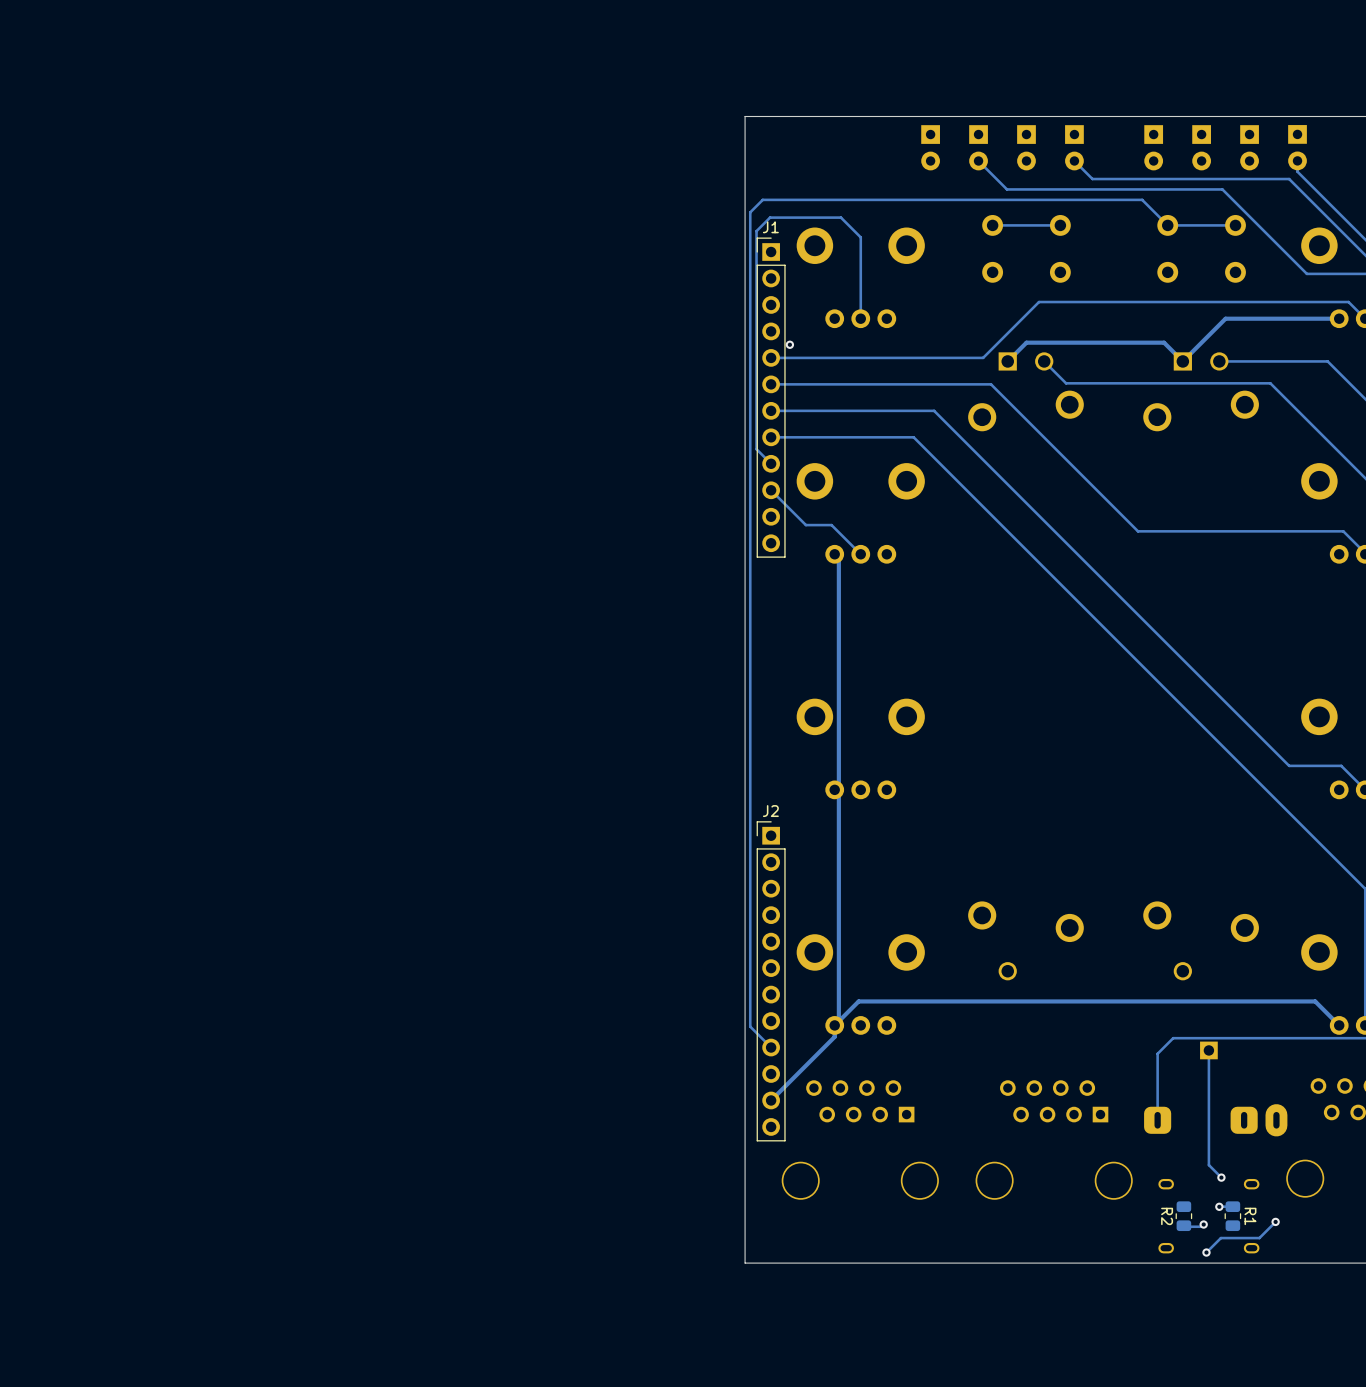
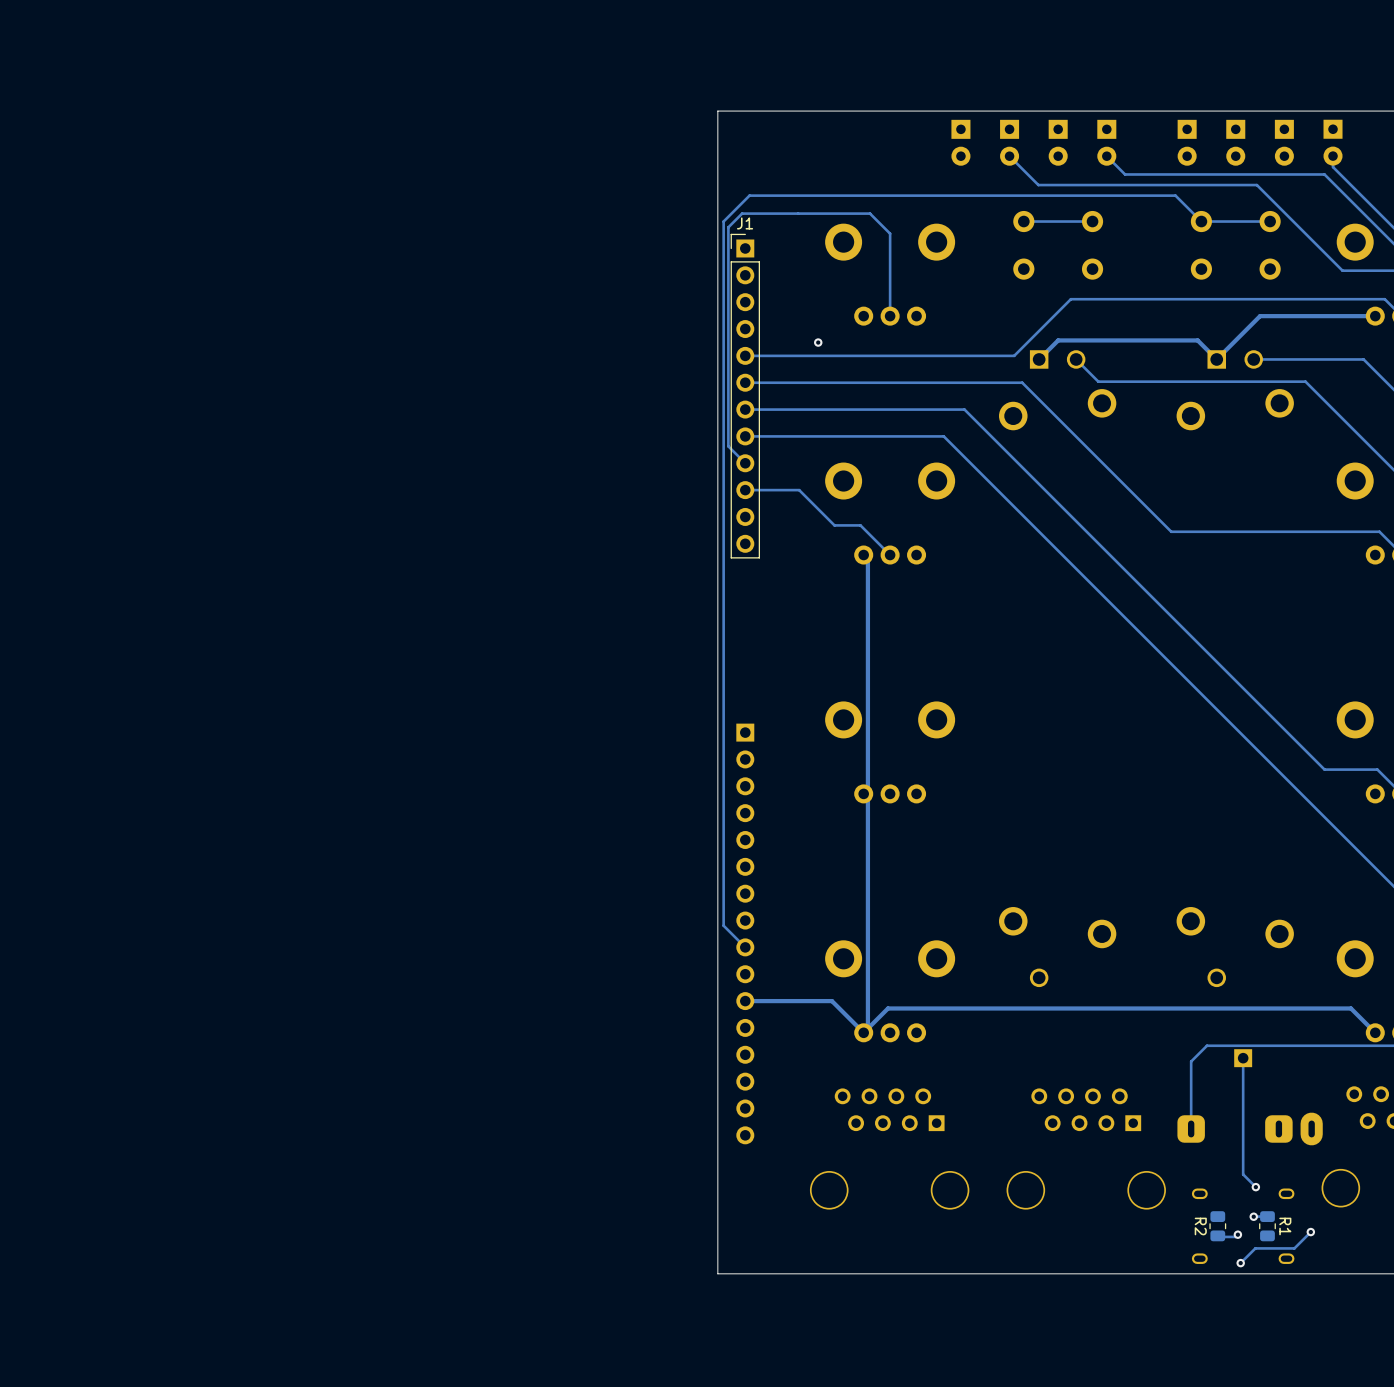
board edge: (745, 116) (745, 1263) -> (772, 111) (717, 111) (717, 1273) (772, 1273)
track: (762, 199) (750, 212) (750, 1026) (771, 1047) -> (790, 195) (749, 195) (723, 221) (723, 925) (745, 947)
track: (770, 217) (756, 231) (756, 449) (771, 463) -> (798, 213) (742, 213) (728, 227) (728, 446) (745, 463)
track: none -> (799, 355) (745, 355)
track: none -> (799, 382) (745, 382)
J1 position: (771, 397) -> (745, 396)
track: none -> (799, 409) (745, 409)
track: none -> (799, 436) (745, 436)
track: none -> (799, 490) (745, 490)
part: none -> (745, 933)
J2: (771, 981) -> none
track: (834, 1025) (834, 1036) (771, 1100) -> (863, 1032) (831, 1001) (745, 1001)

